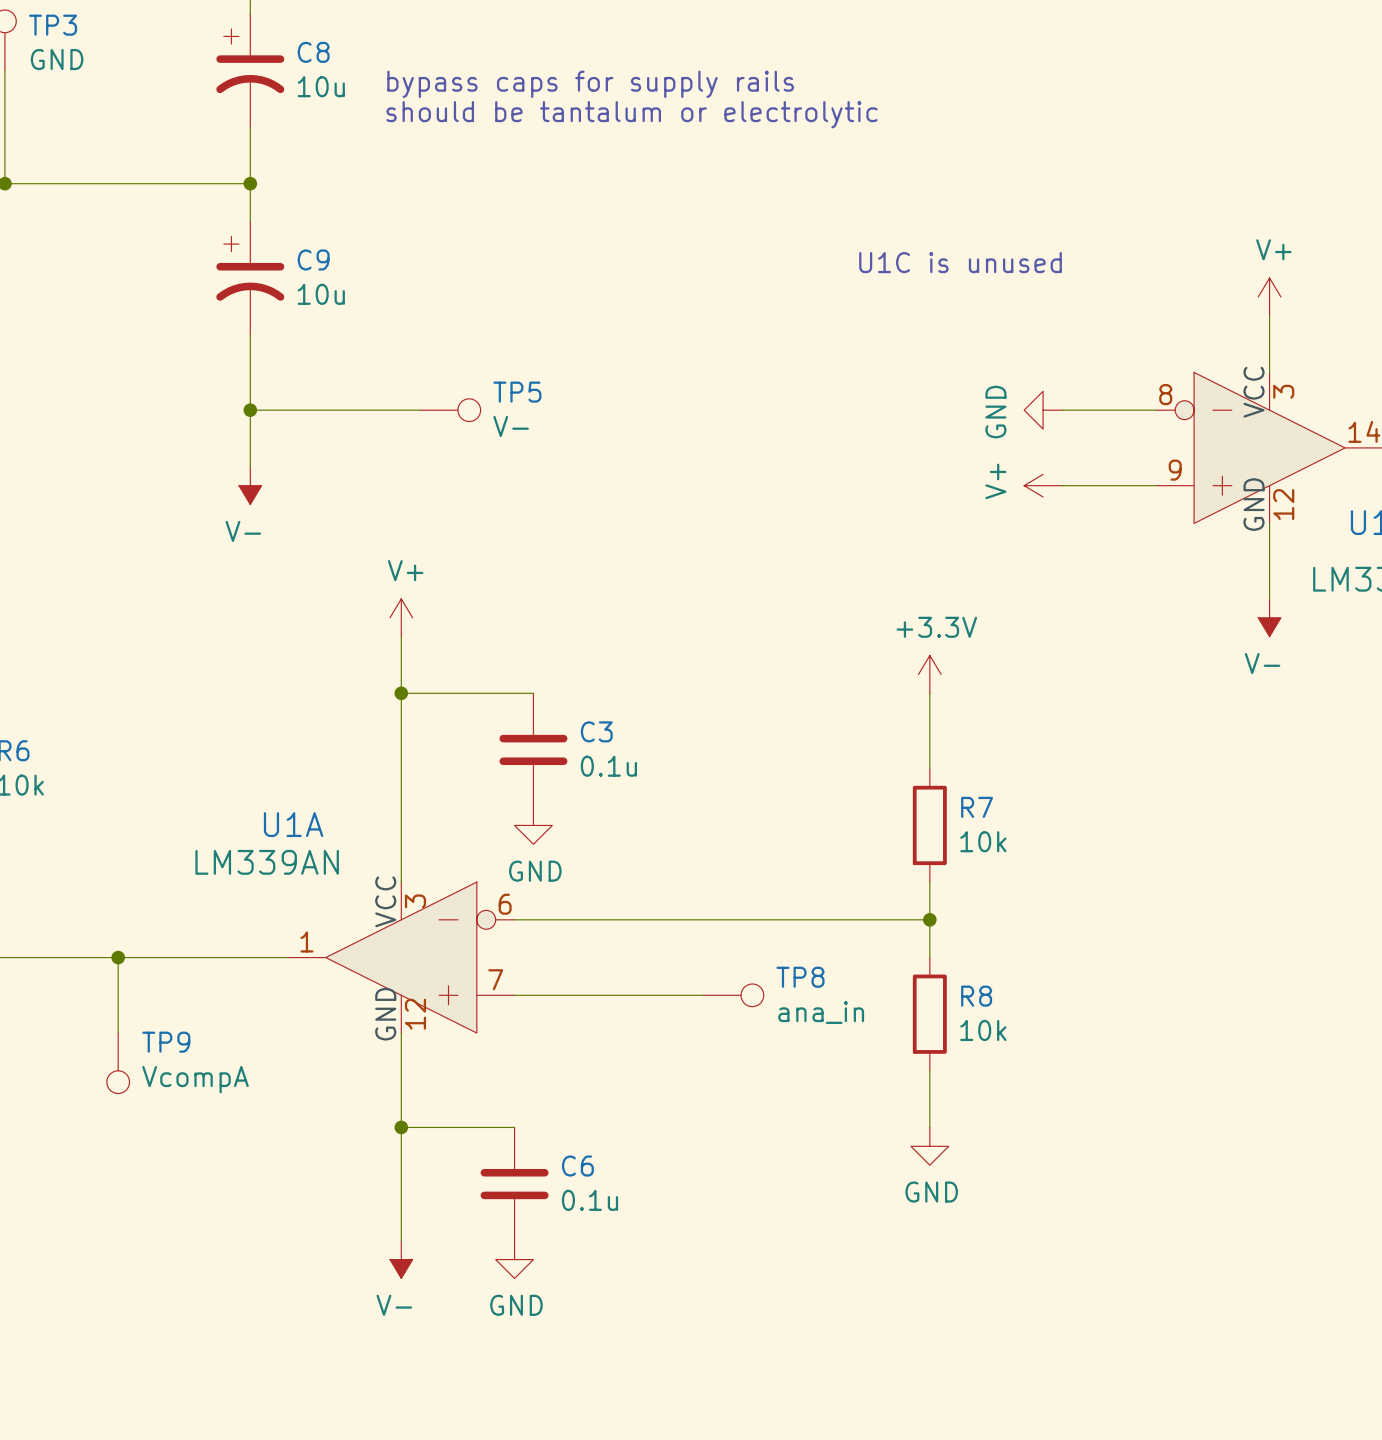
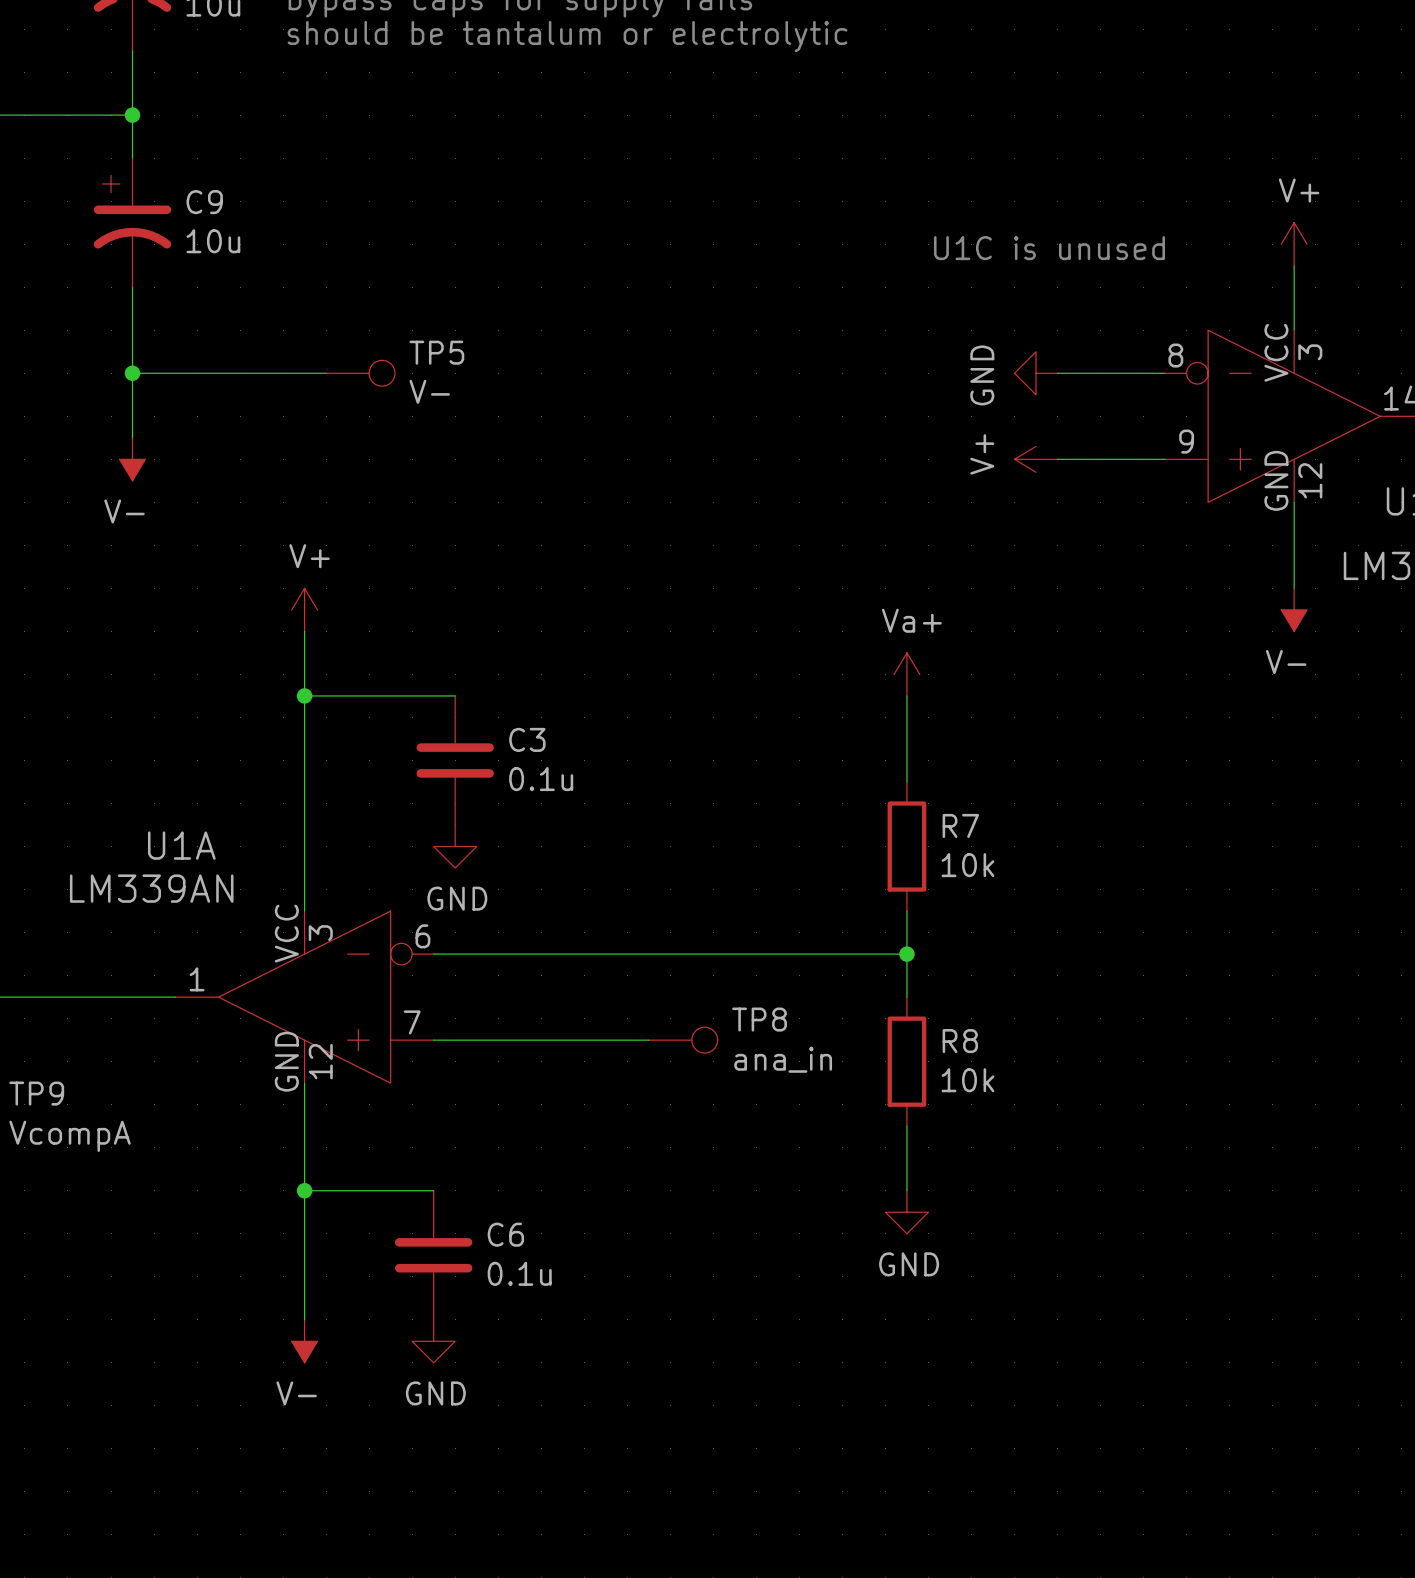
text position: U1C is unused (960, 262) -> U1C is unused (1049, 248)
power symbol: +3.3V (929, 674) -> Va+ (906, 674)

